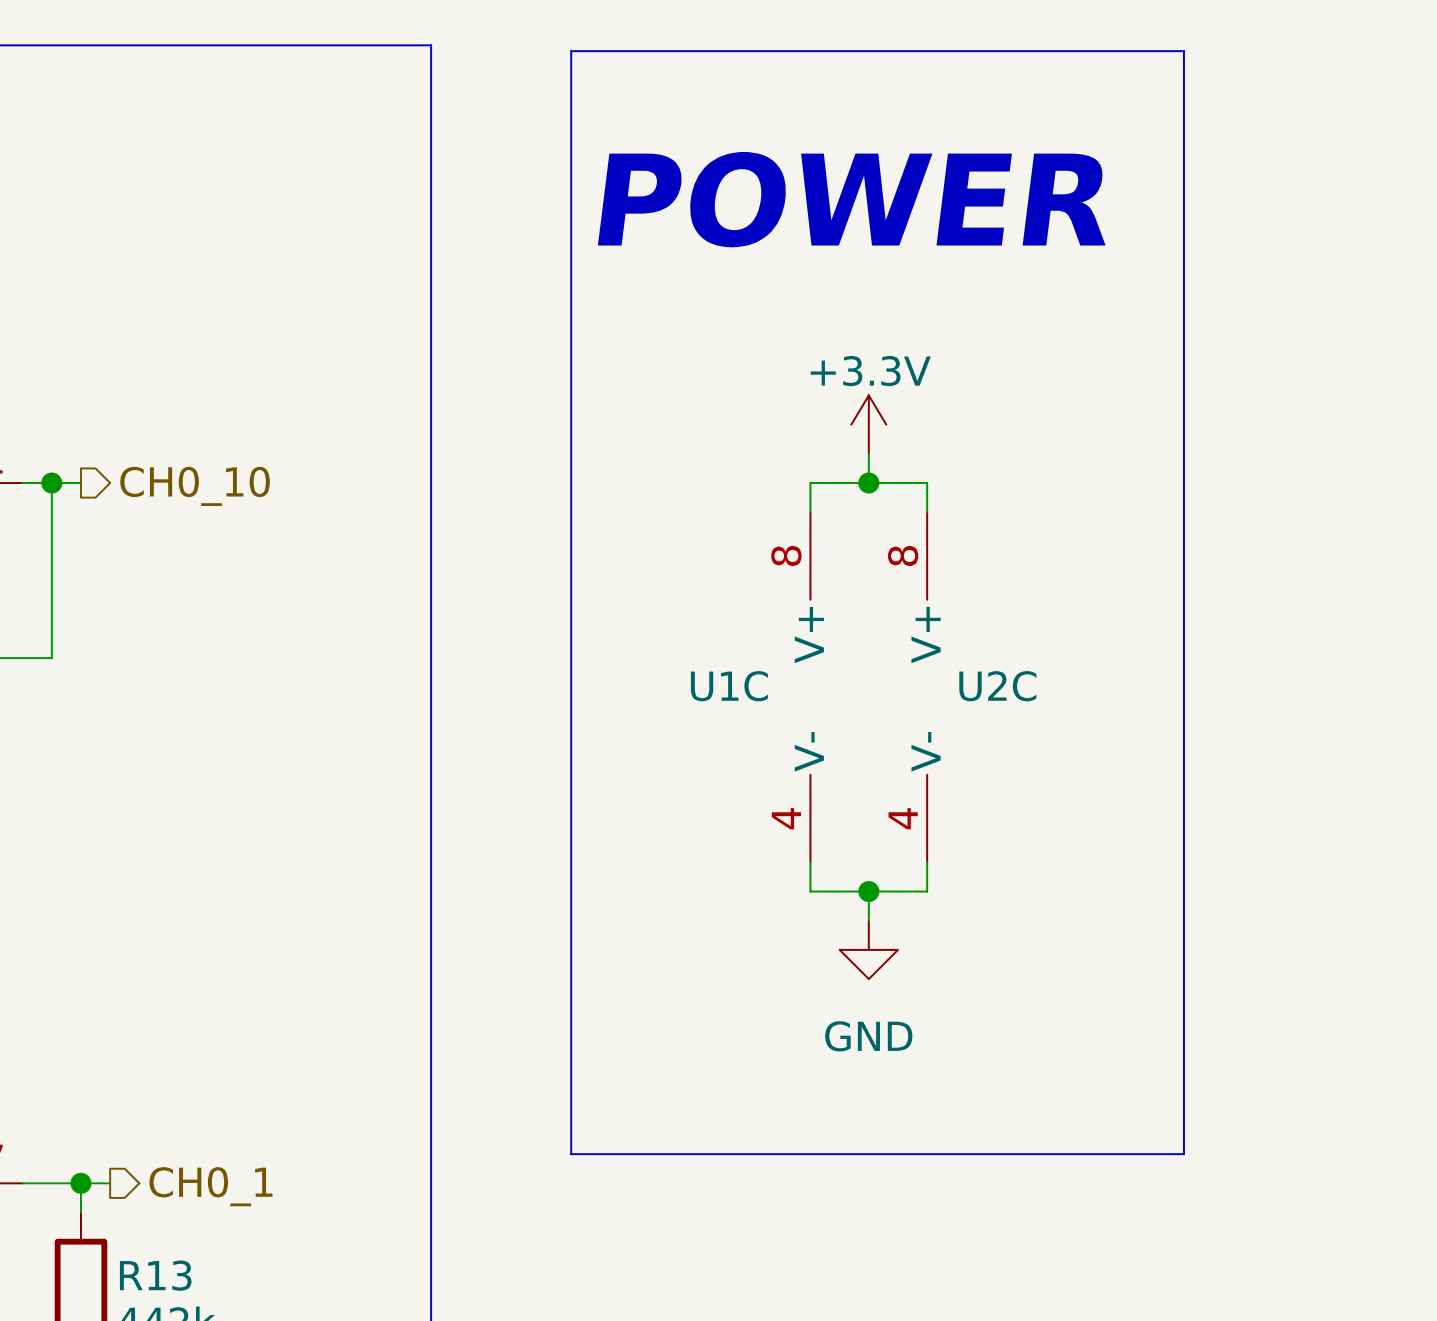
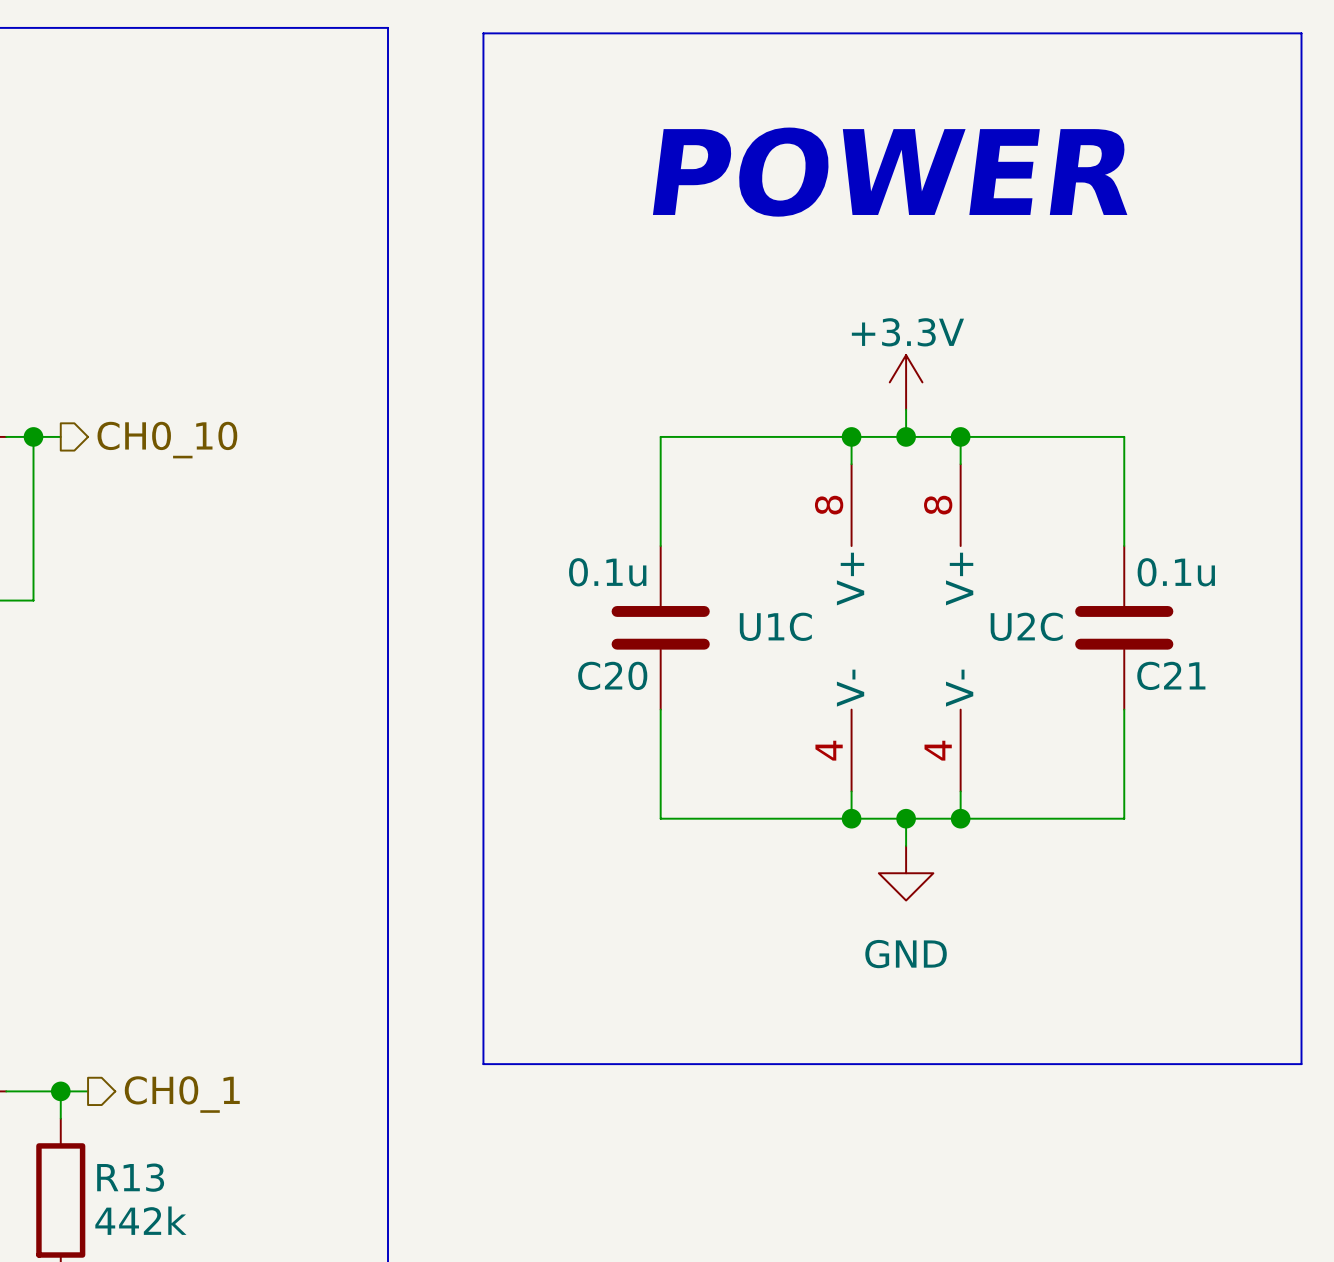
line: (571, 51) (571, 1154) -> (518, 33) (483, 33) (483, 1064) (518, 1064)
line: (1183, 51) (1183, 1154) -> (1091, 33) (1301, 33) (1301, 1064) (1091, 1064)
text position: POWER (851, 199) -> POWER (890, 172)
power symbol position: +3.3V (868, 424) -> +3.3V (906, 382)
wire: (868, 453) (868, 483) -> (906, 409) (906, 436)
wire: (810, 483) (810, 512) -> (742, 436) (660, 436) (660, 546)
junction: (868, 483) -> none
wire: none -> (851, 436) (1124, 436) (1124, 546)
junction: none -> (851, 436)
junction: none -> (906, 436)
wire: none -> (960, 436) (960, 464)
junction: none -> (960, 436)
U2C name: U2C (997, 686) -> U1C (775, 626)
C20: none -> 0.1u (660, 627)
U1C: (810, 687) -> none
U2C: none -> (960, 627)
C21: none -> 0.1u (1124, 627)
wire: none -> (1124, 709) (1124, 818) (851, 818)
wire: (810, 862) (810, 891) -> (660, 709) (660, 818) (742, 818)
wire: none -> (960, 791) (960, 818)
wire: (868, 891) (868, 920) -> (906, 818) (906, 845)
junction: (868, 891) -> none
junction: none -> (851, 818)
junction: none -> (906, 818)
junction: none -> (960, 818)
power symbol position: GND (868, 949) -> GND (906, 873)

